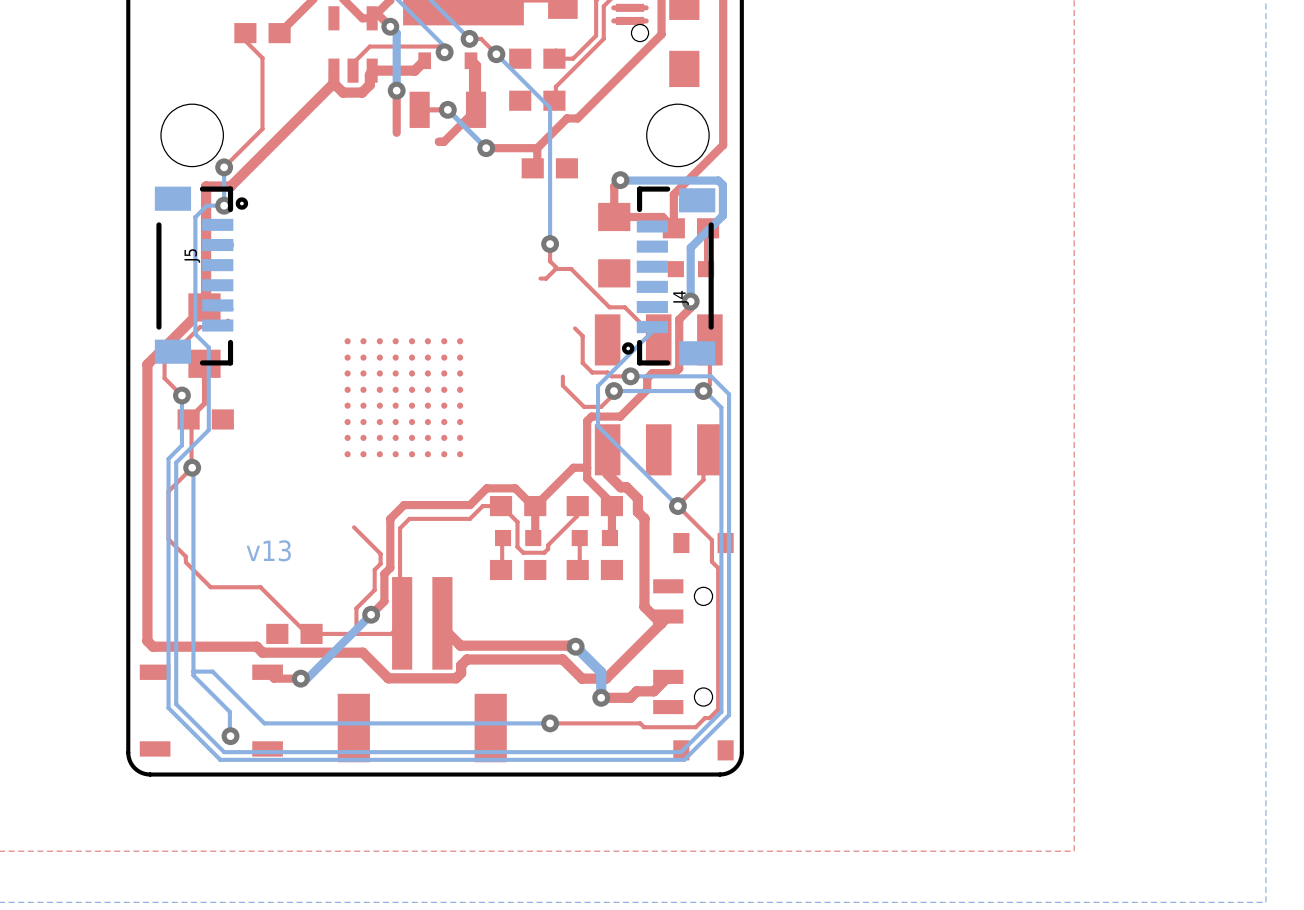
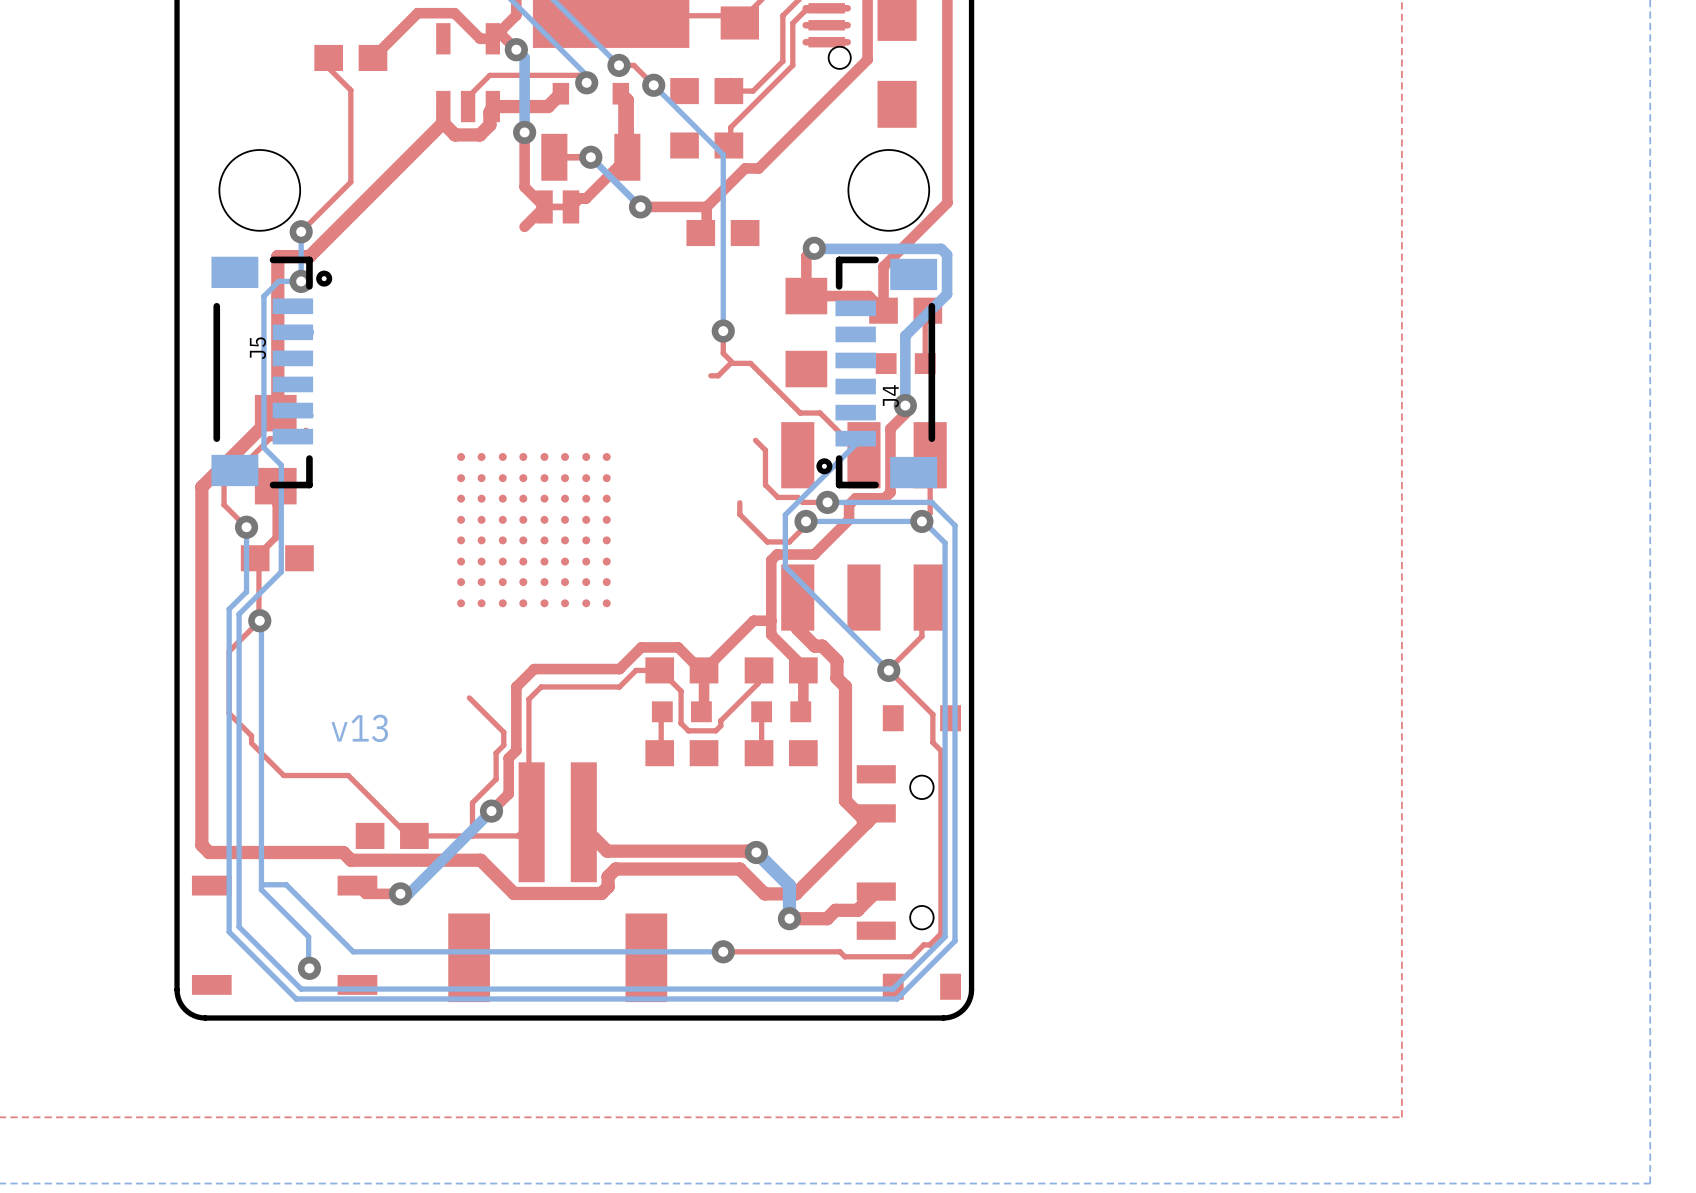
top track: none -> (524, 187) (544, 206) (524, 226)
part: none -> (557, 206)

